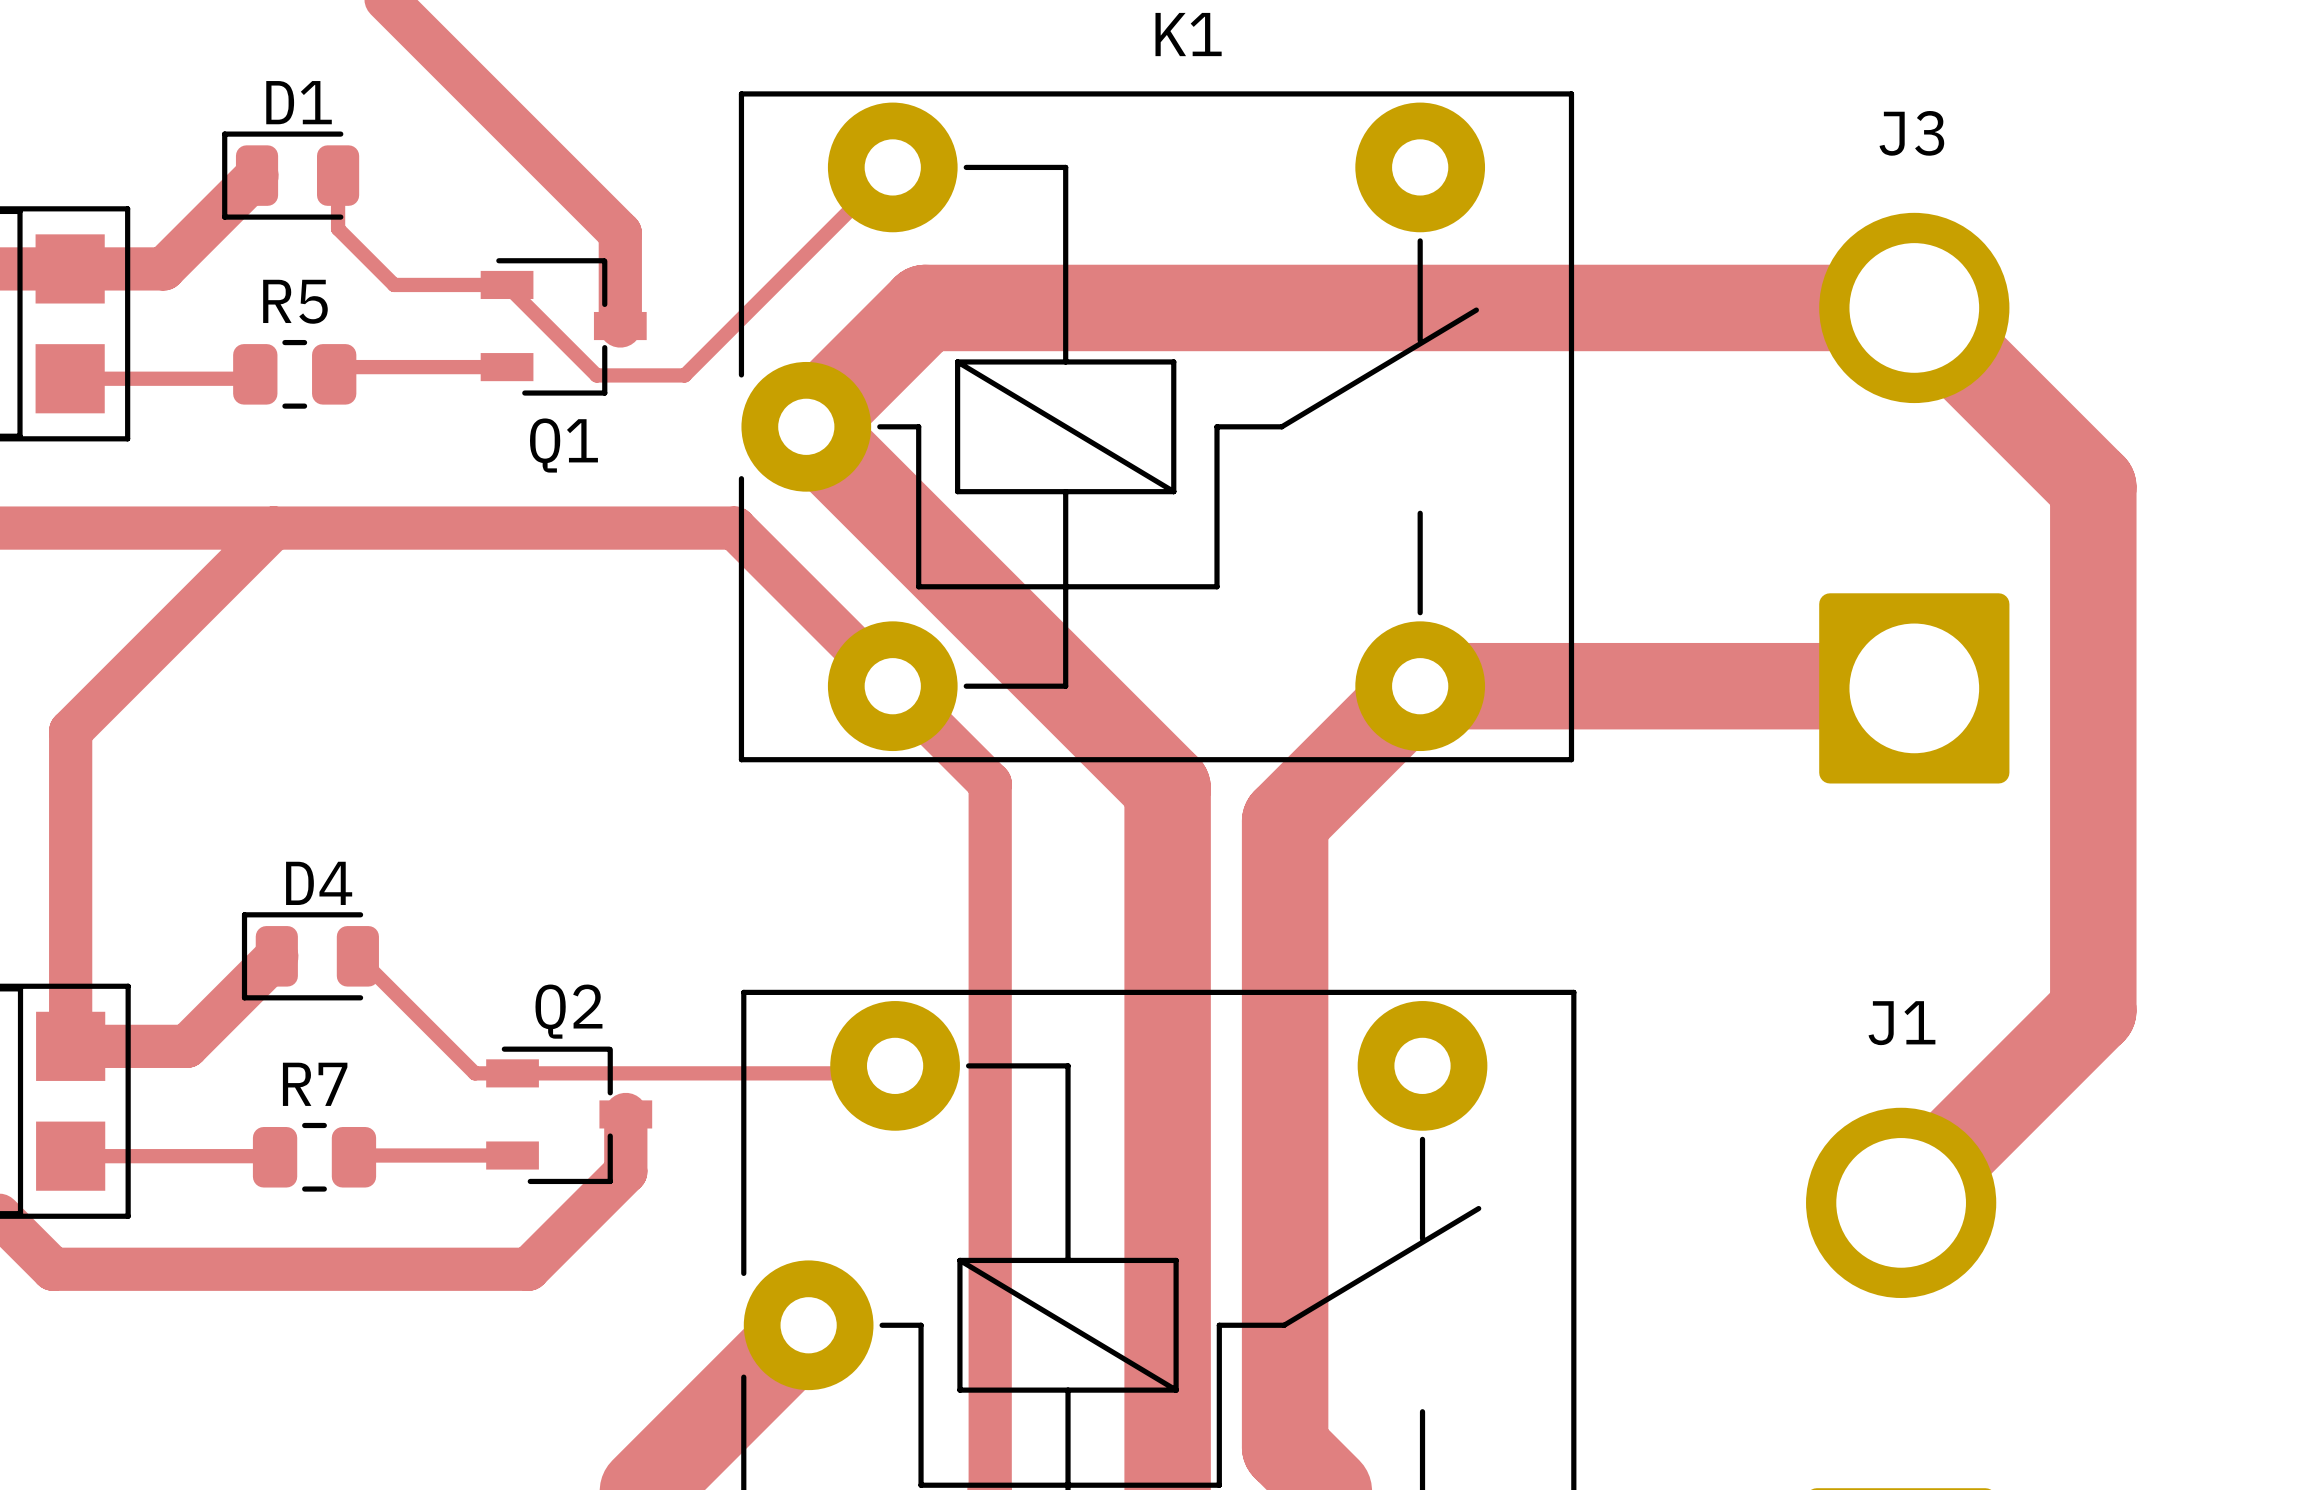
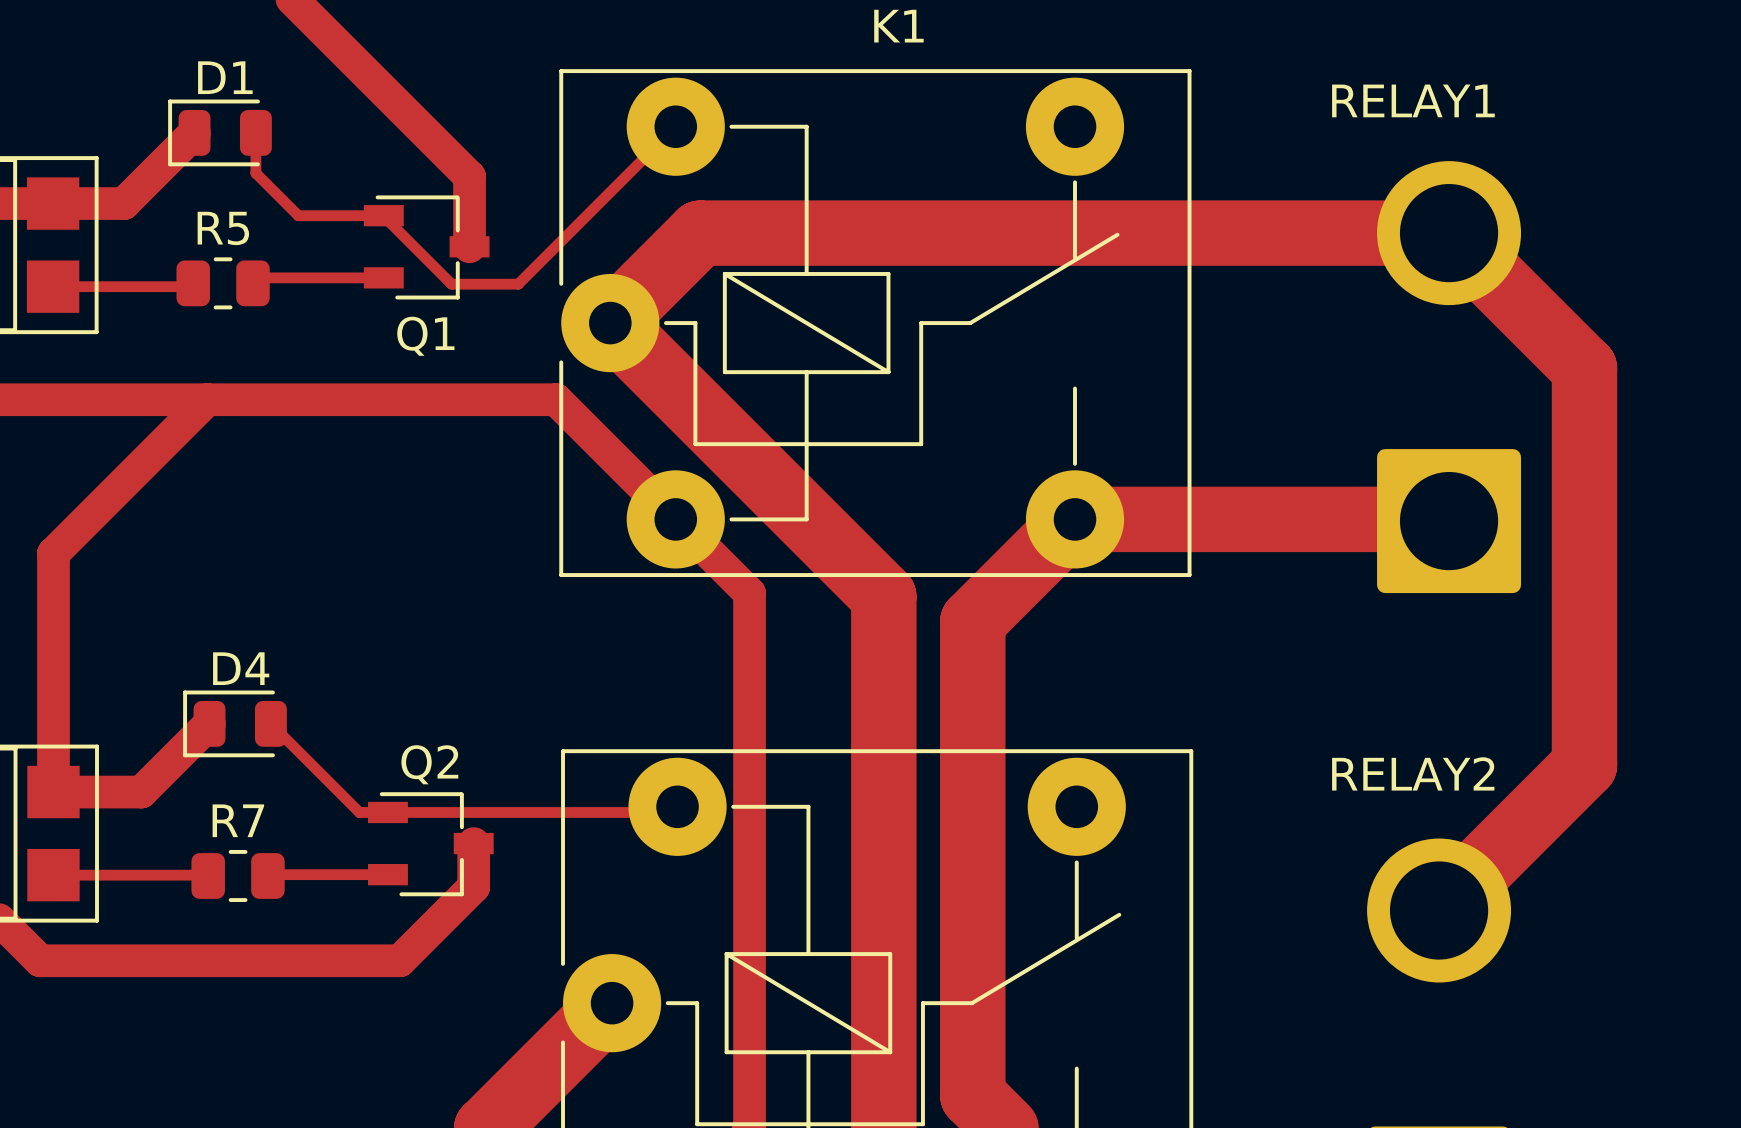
J3 name: J3 (1911, 133) -> RELAY1 (1413, 100)
J1 name: J1 (1901, 1023) -> RELAY2 (1413, 773)

